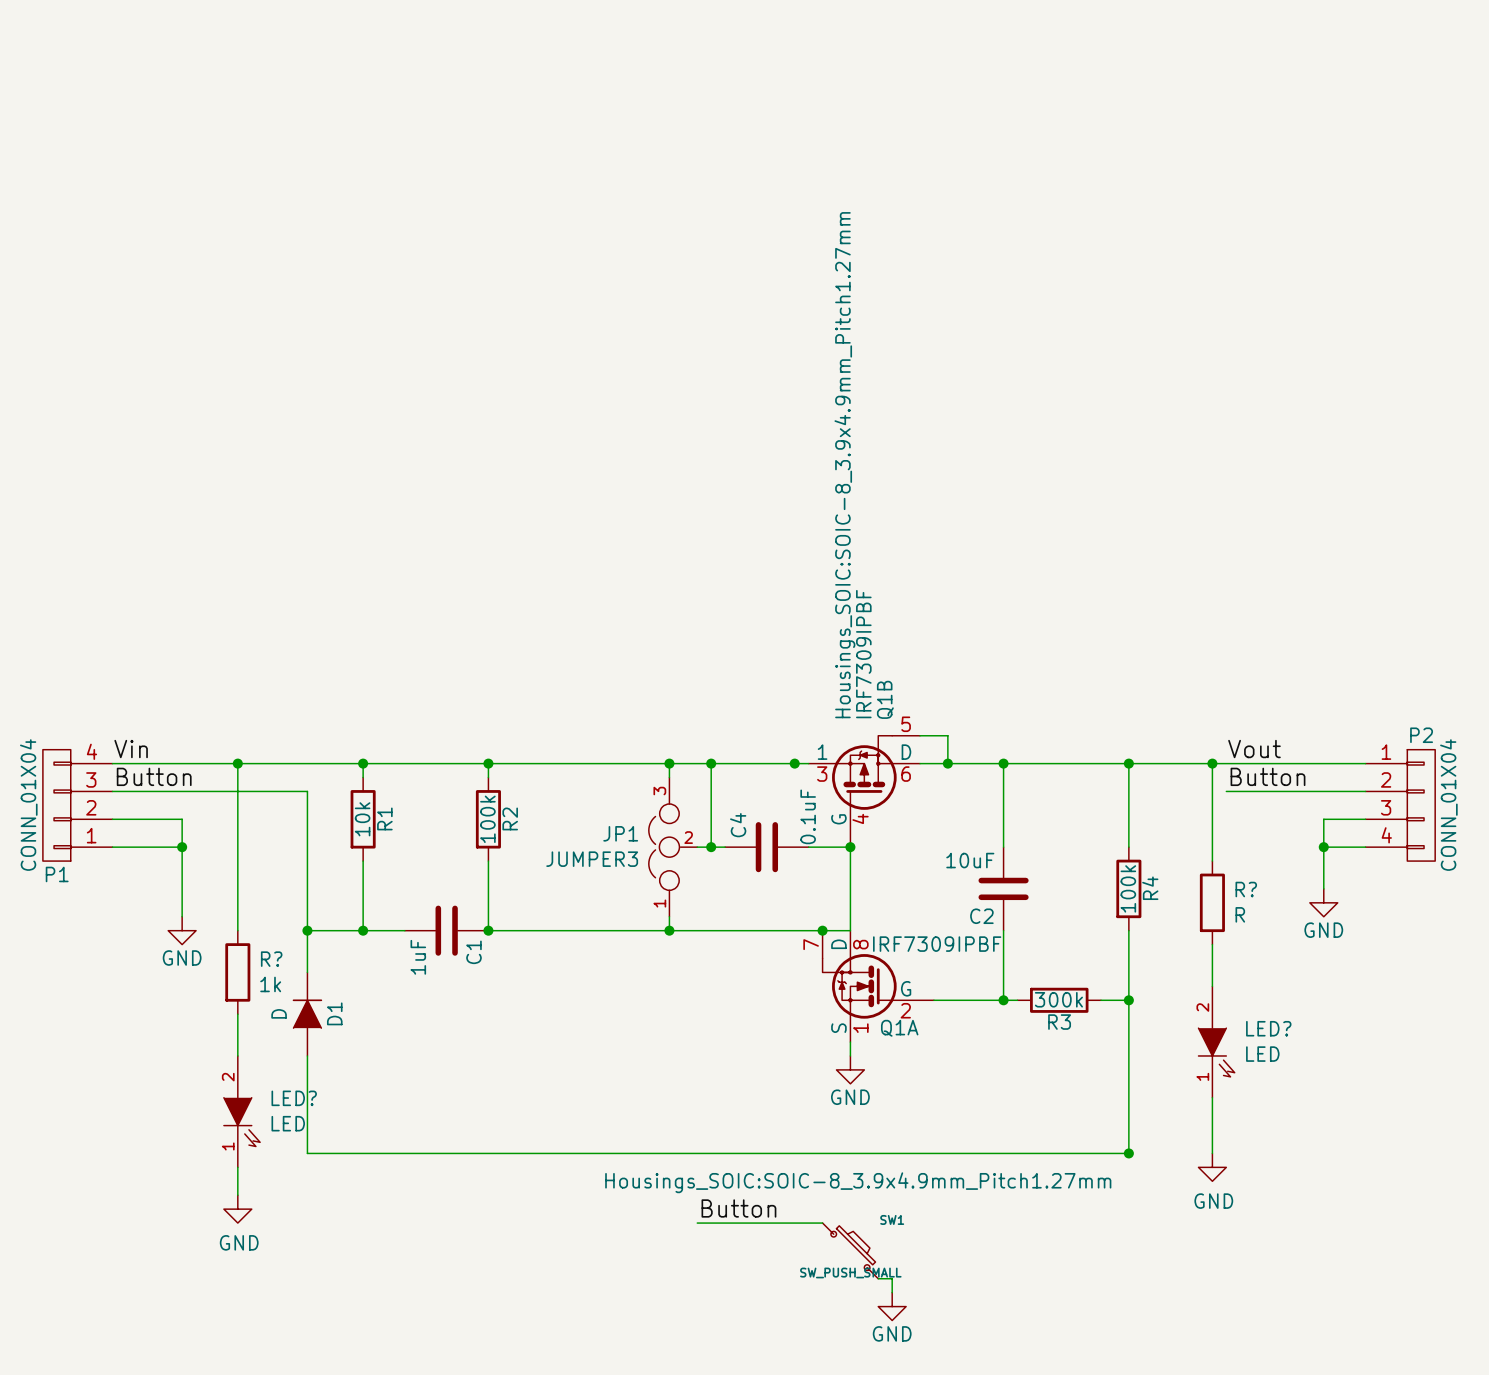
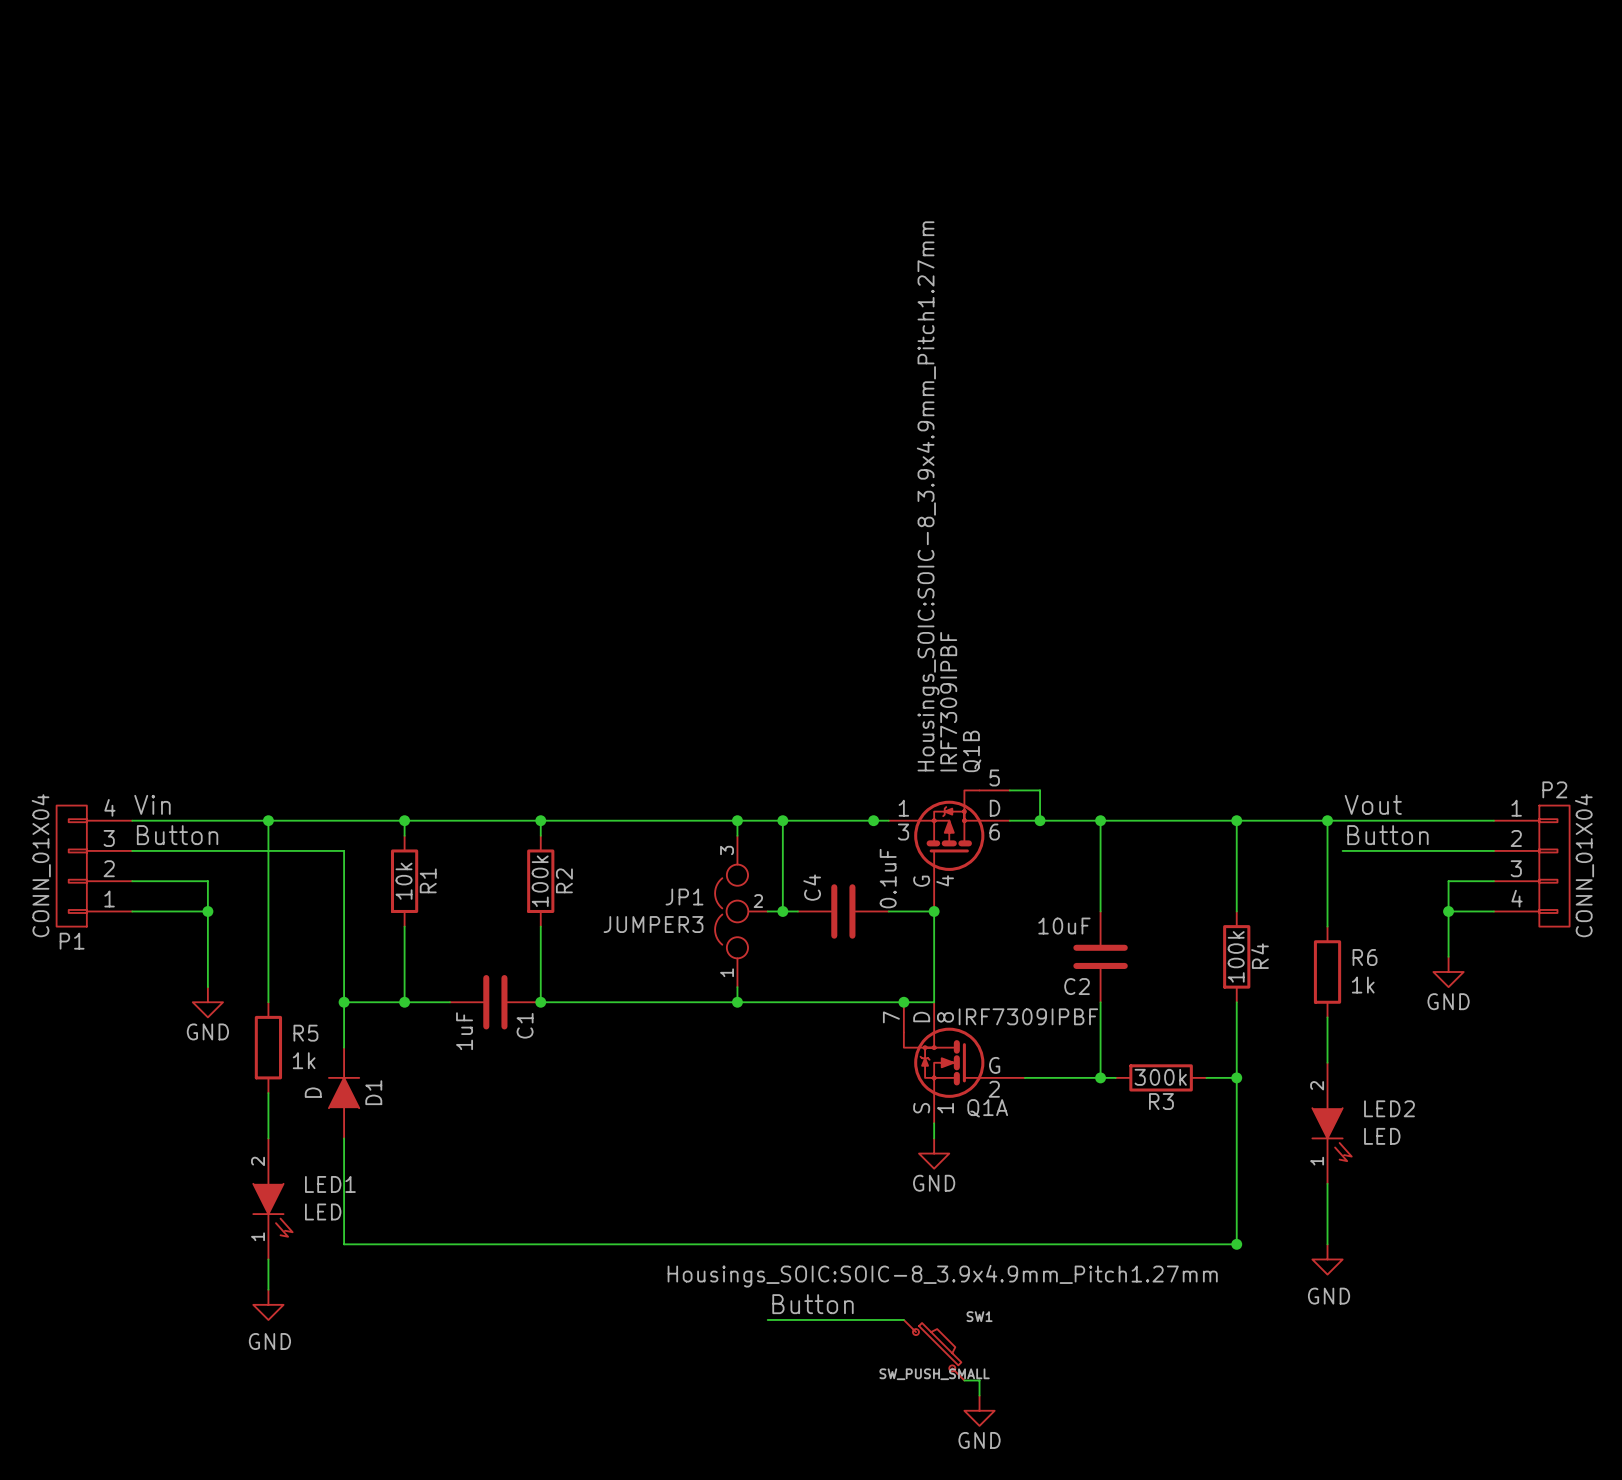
R? name: R? (1246, 889) -> R6 (1365, 957)
R? value: R (1240, 914) -> 1k (1363, 985)
R? name: R? (271, 959) -> R5 (305, 1033)
LED? name: LED? (1268, 1028) -> LED2 (1389, 1108)
LED? name: LED? (294, 1098) -> LED1 (330, 1184)

